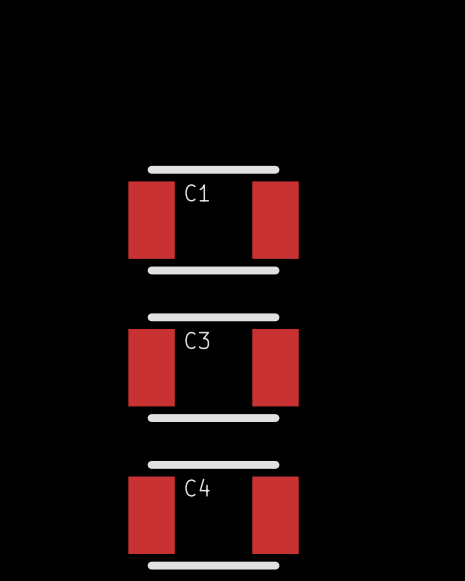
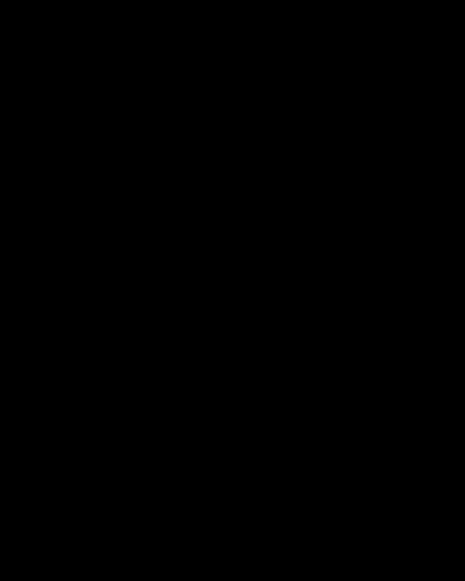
C1: (213, 220) -> none
C3: (213, 367) -> none
C4: (213, 515) -> none

